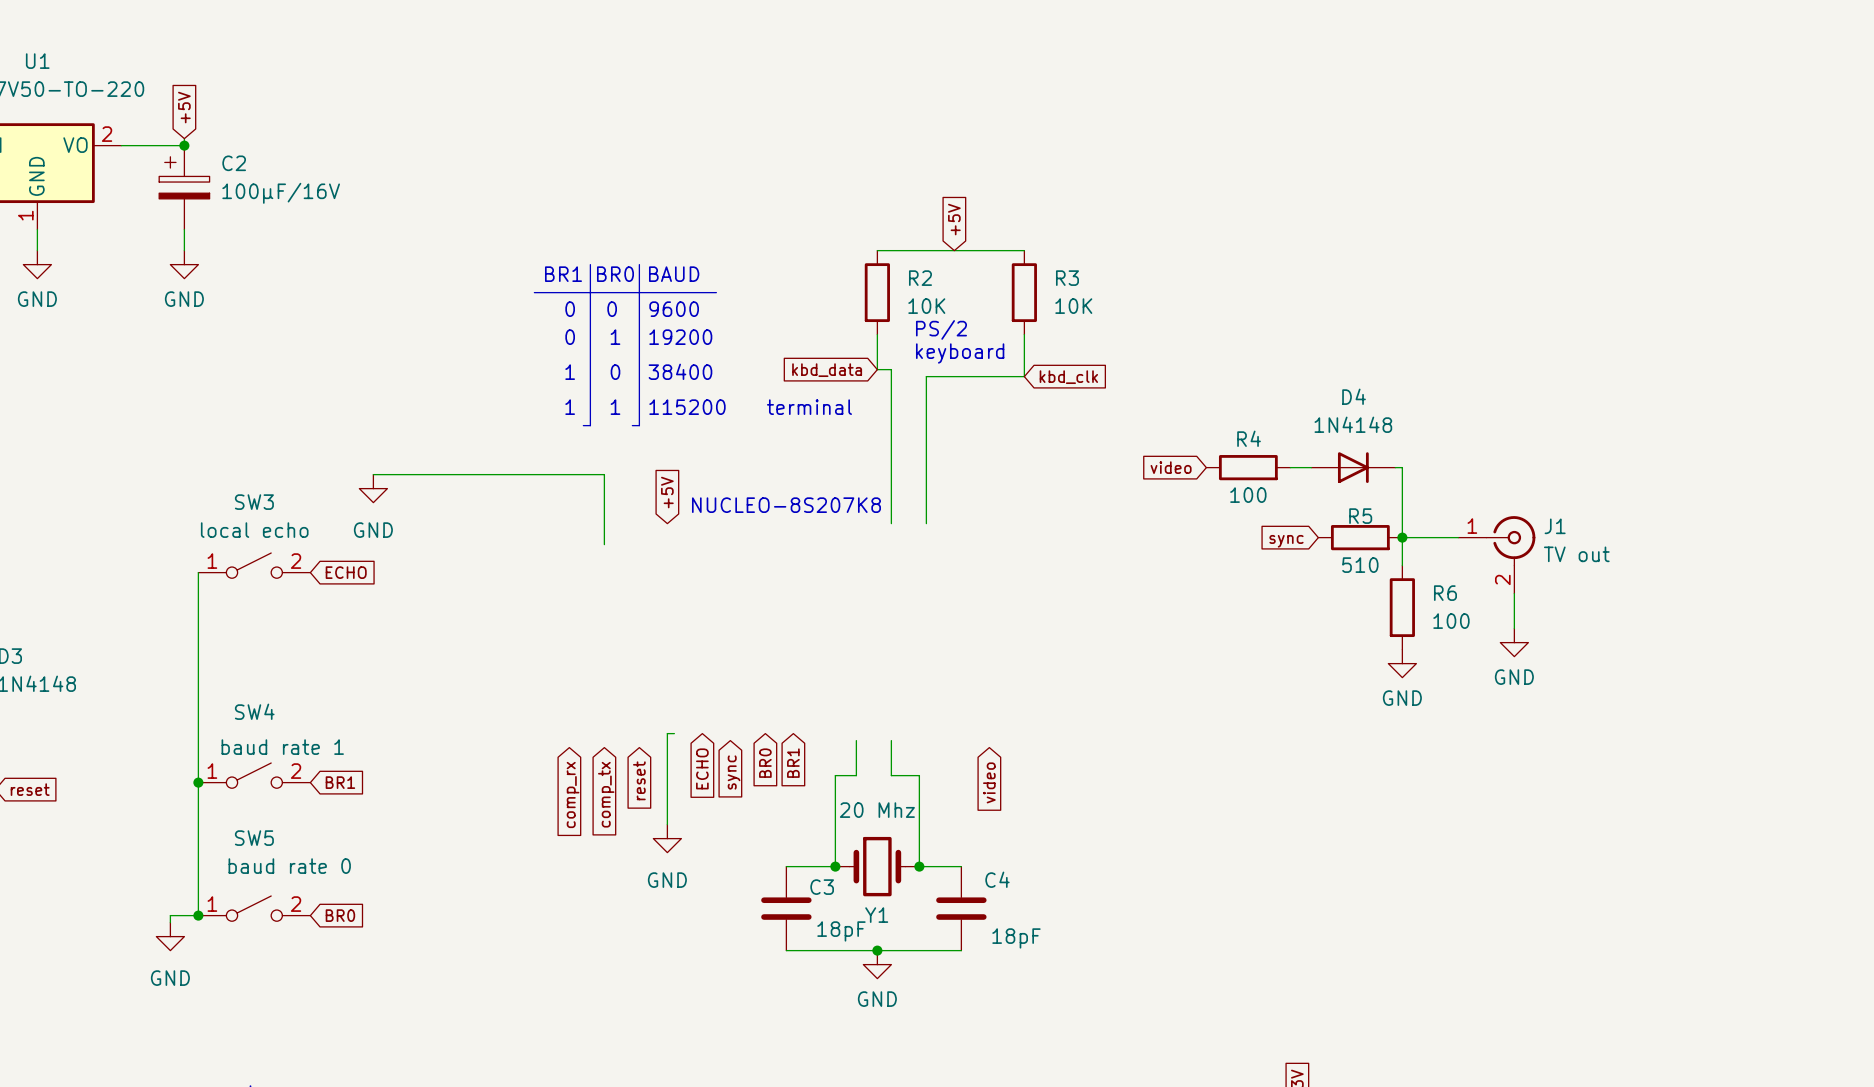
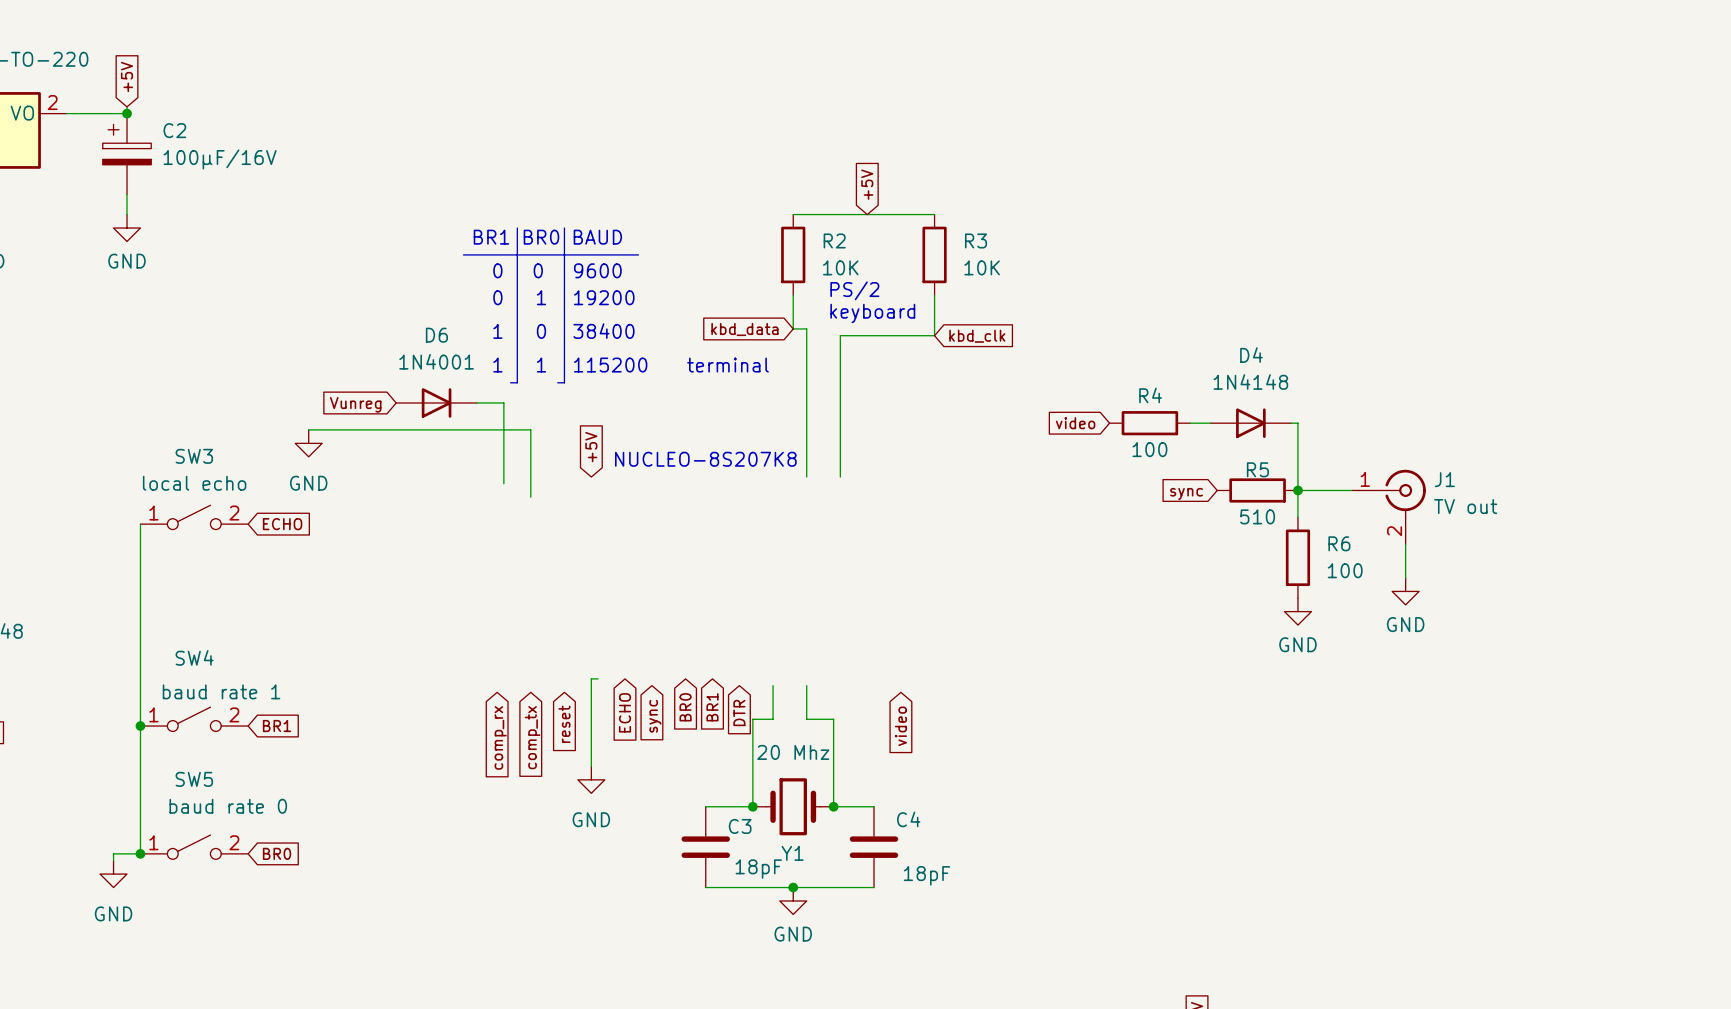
D6: none -> 1N4001 (436, 402)
wire: none -> (476, 402) (503, 402) (503, 483)
global label: none -> Vunreg (355, 404)
global label: none -> DTR (739, 713)

